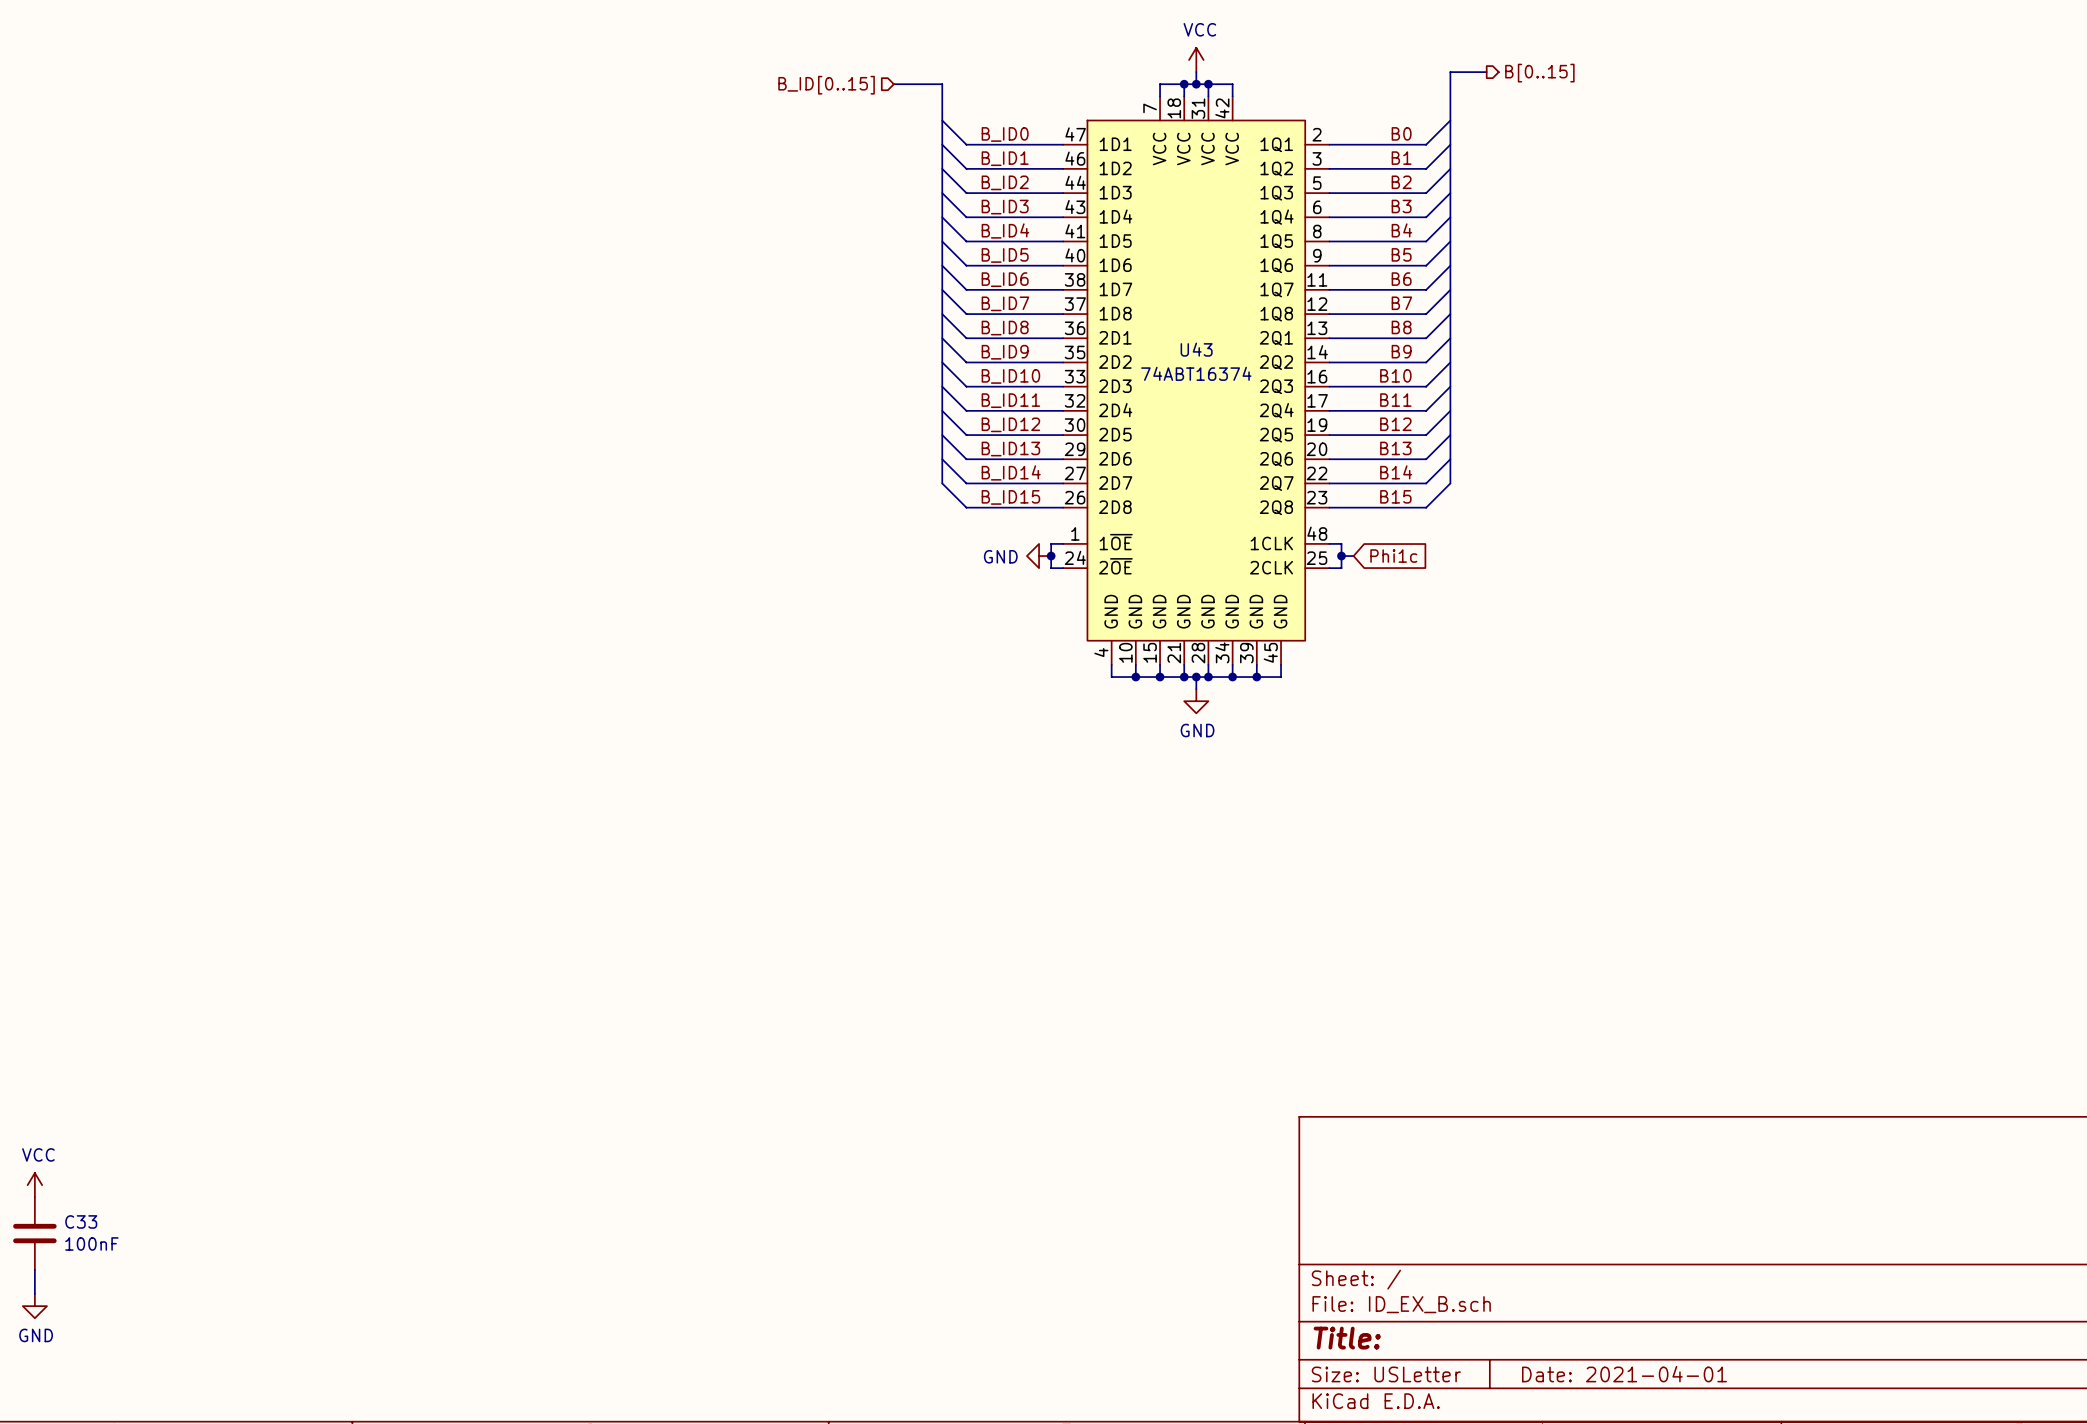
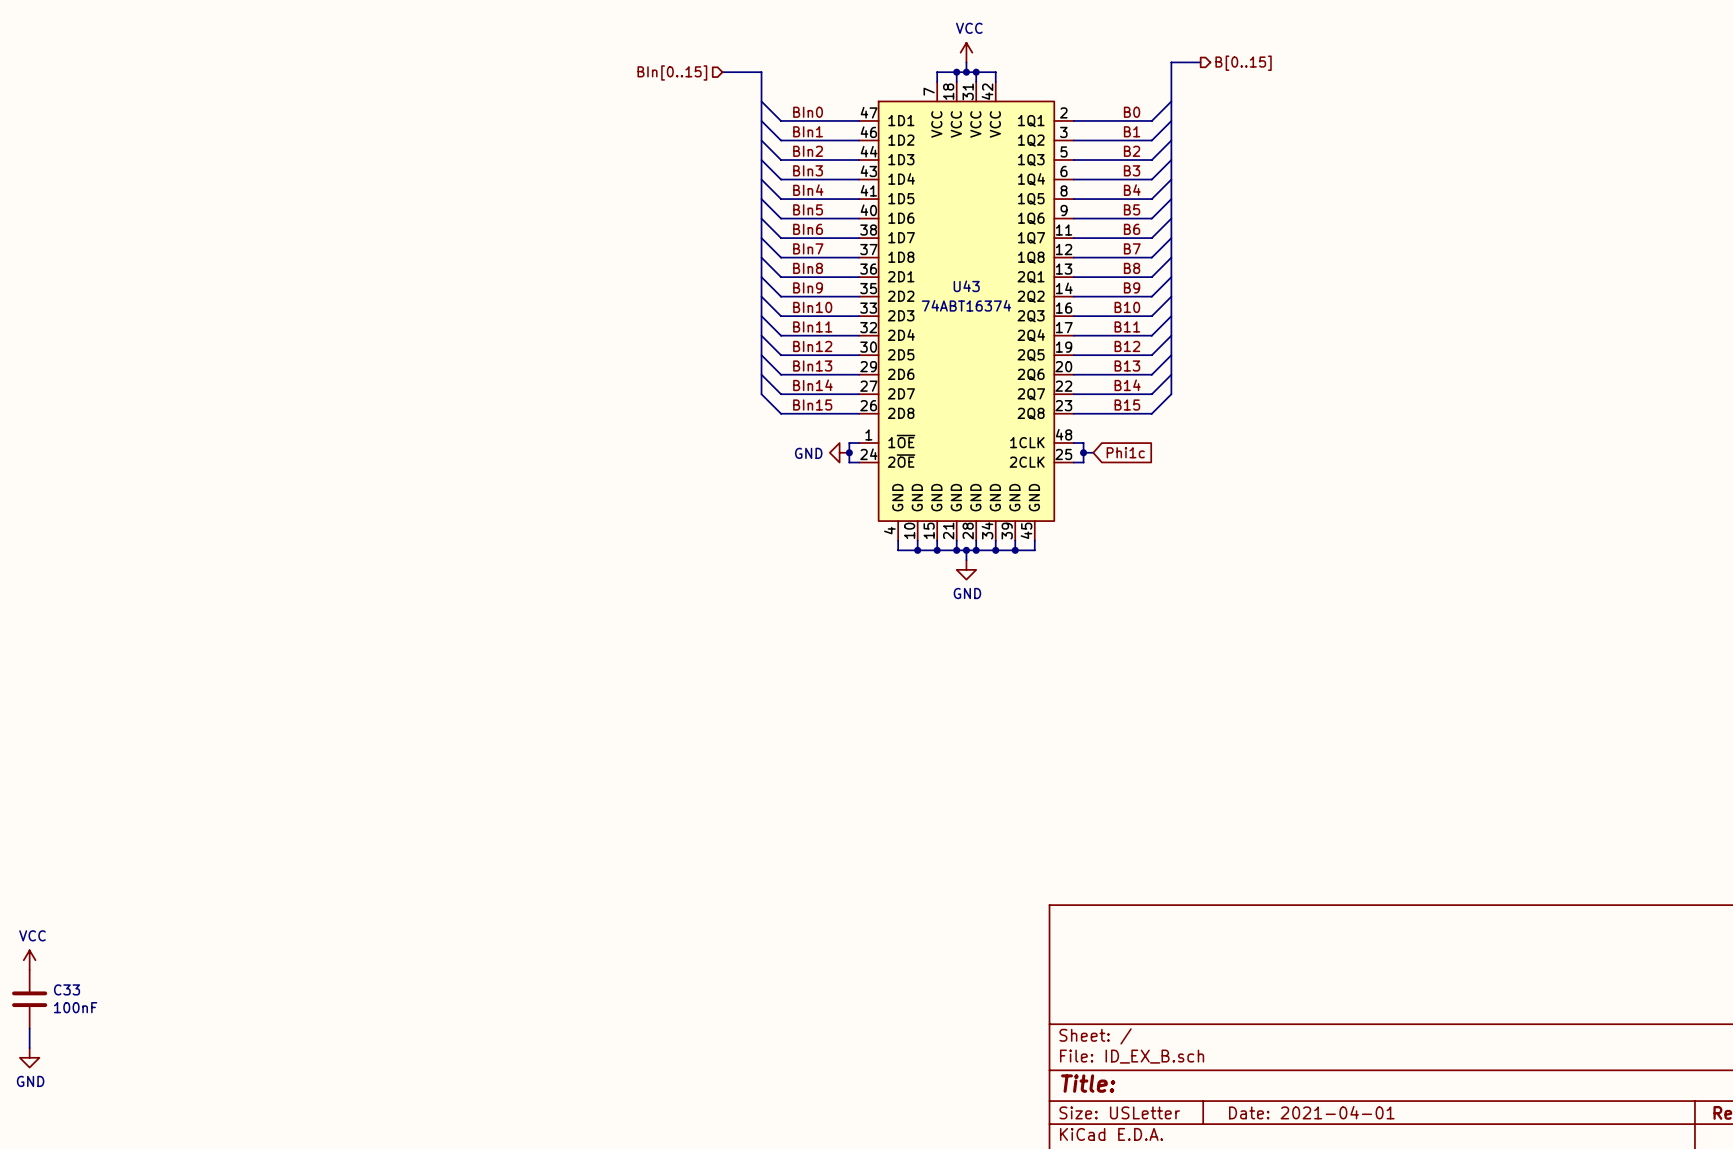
hierarchical label: B_ID[0..15] (826, 85) -> BIn[0..15] (672, 72)
label: B_ID0 (1005, 134) -> BIn0 (808, 112)
label: B_ID1 (1005, 158) -> BIn1 (808, 131)
label: B_ID2 (1005, 182) -> BIn2 (808, 151)
label: B_ID3 (1005, 207) -> BIn3 (808, 170)
label: B_ID4 (1005, 230) -> BIn4 (808, 190)
label: B_ID5 (1005, 255) -> BIn5 (808, 209)
label: B_ID6 (1005, 279) -> BIn6 (808, 229)
label: B_ID7 (1005, 303) -> BIn7 (808, 248)
label: B_ID8 (1005, 328) -> BIn8 (808, 268)
label: B_ID9 (1005, 352) -> BIn9 (808, 287)
label: B_ID10 (1010, 376) -> BIn10 (812, 307)
label: B_ID11 (1010, 400) -> BIn11 (812, 326)
label: B_ID12 (1010, 424) -> BIn12 (812, 346)
label: B_ID13 (1010, 449) -> BIn13 (812, 365)
label: B_ID14 (1011, 472) -> BIn14 (812, 385)
label: B_ID15 (1010, 497) -> BIn15 (812, 405)

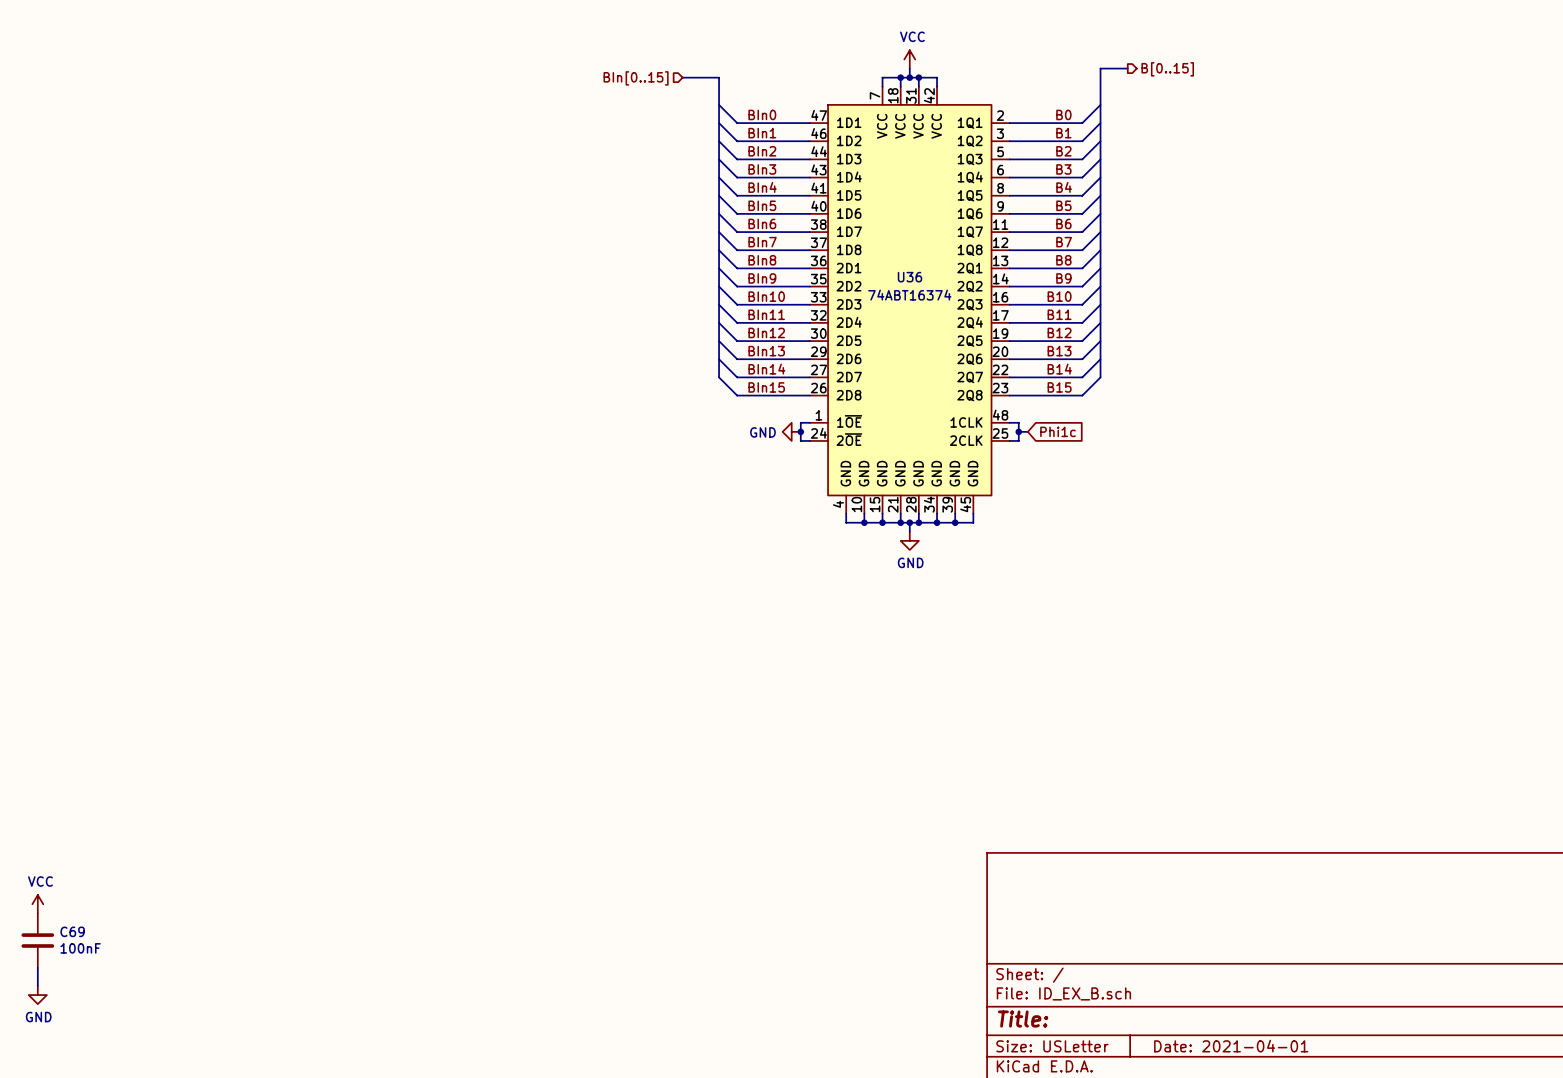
U43 name: U43 (966, 286) -> U36 (909, 277)
C33 name: C33 (67, 989) -> C69 (72, 931)

